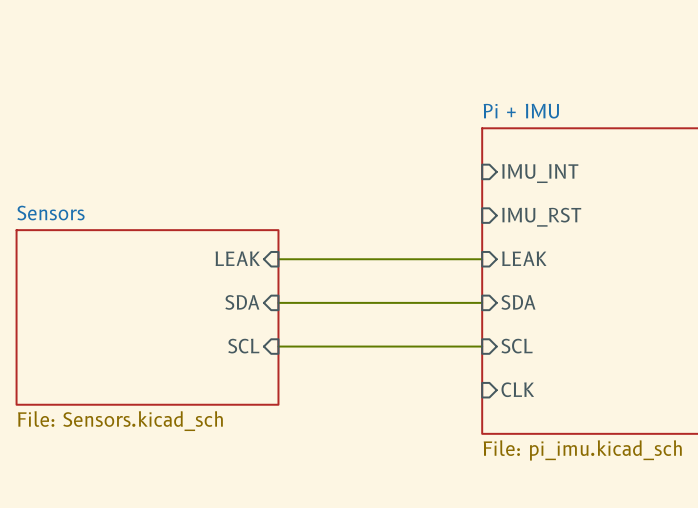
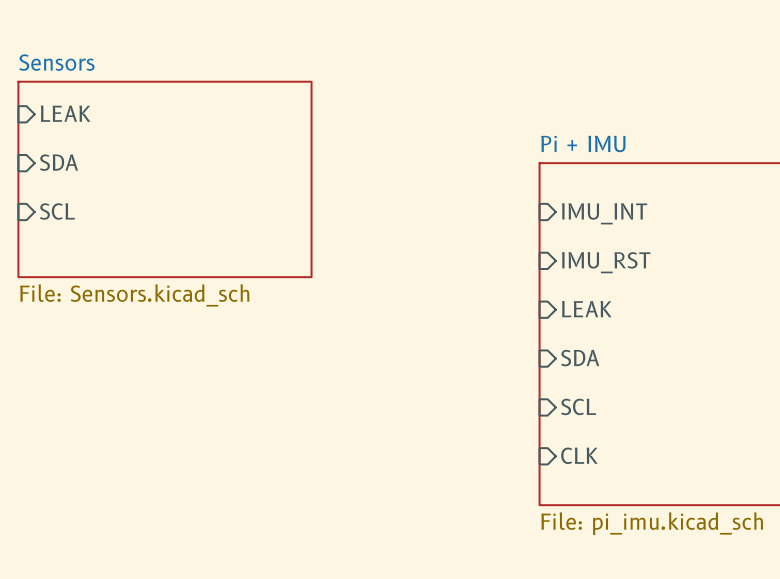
sheet pin rotation: 0° (237, 258) -> 180° (65, 113)
sheet pin position: LEAK (237, 258) -> LEAK (65, 113)
wire: (278, 259) (482, 259) -> none
sheet pin rotation: 0° (242, 302) -> 180° (59, 162)
sheet pin position: SDA (242, 302) -> SDA (59, 162)
wire: (278, 302) (482, 302) -> none
sheet Sensors position: (147, 317) -> (164, 179)
sheet pin rotation: 0° (243, 346) -> 180° (57, 211)
sheet pin position: SCL (243, 346) -> SCL (57, 211)
wire: (278, 346) (482, 346) -> none

